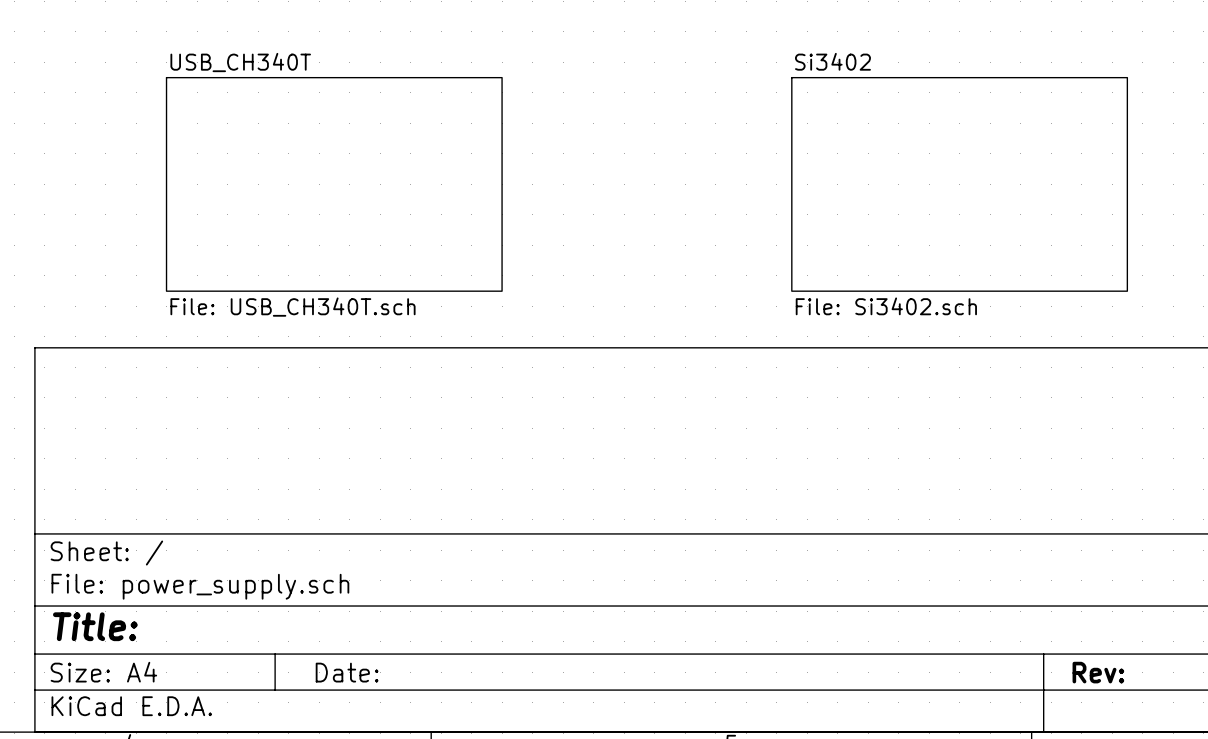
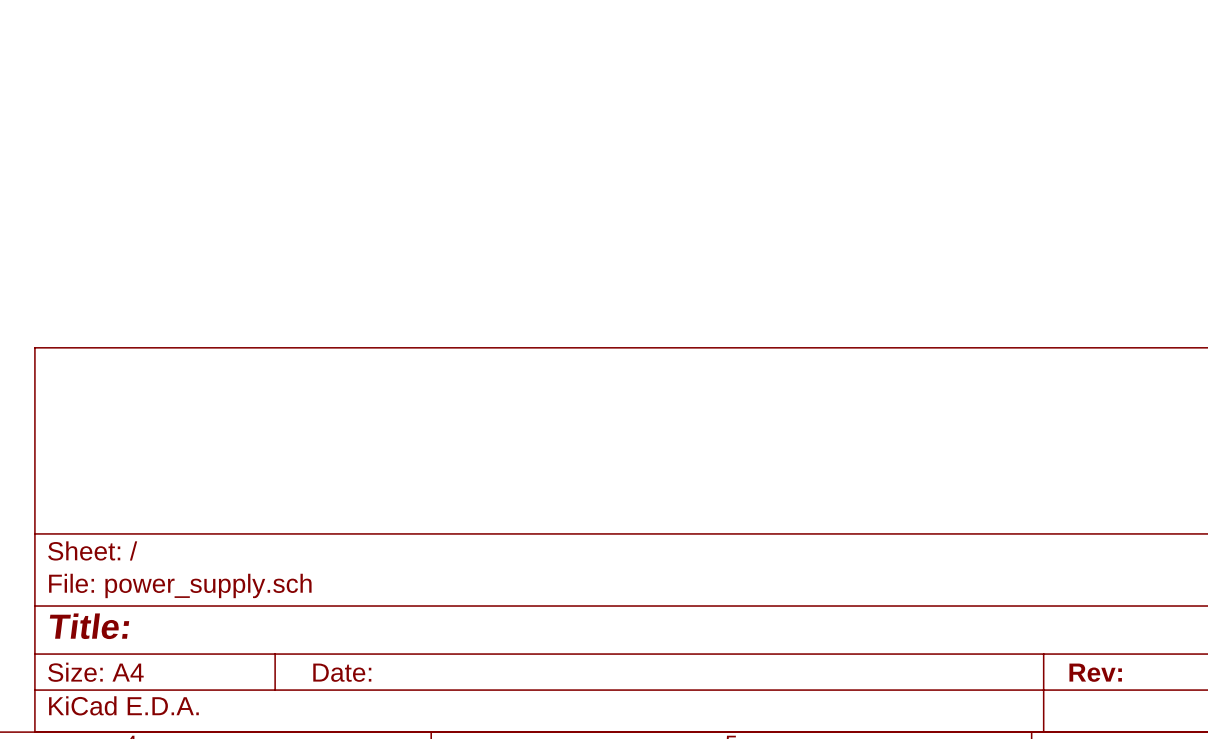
sheet USB_CH340T: File: USB_CH340T.sch (334, 184) -> none
sheet Si3402: File: Si3402.sch (959, 184) -> none

